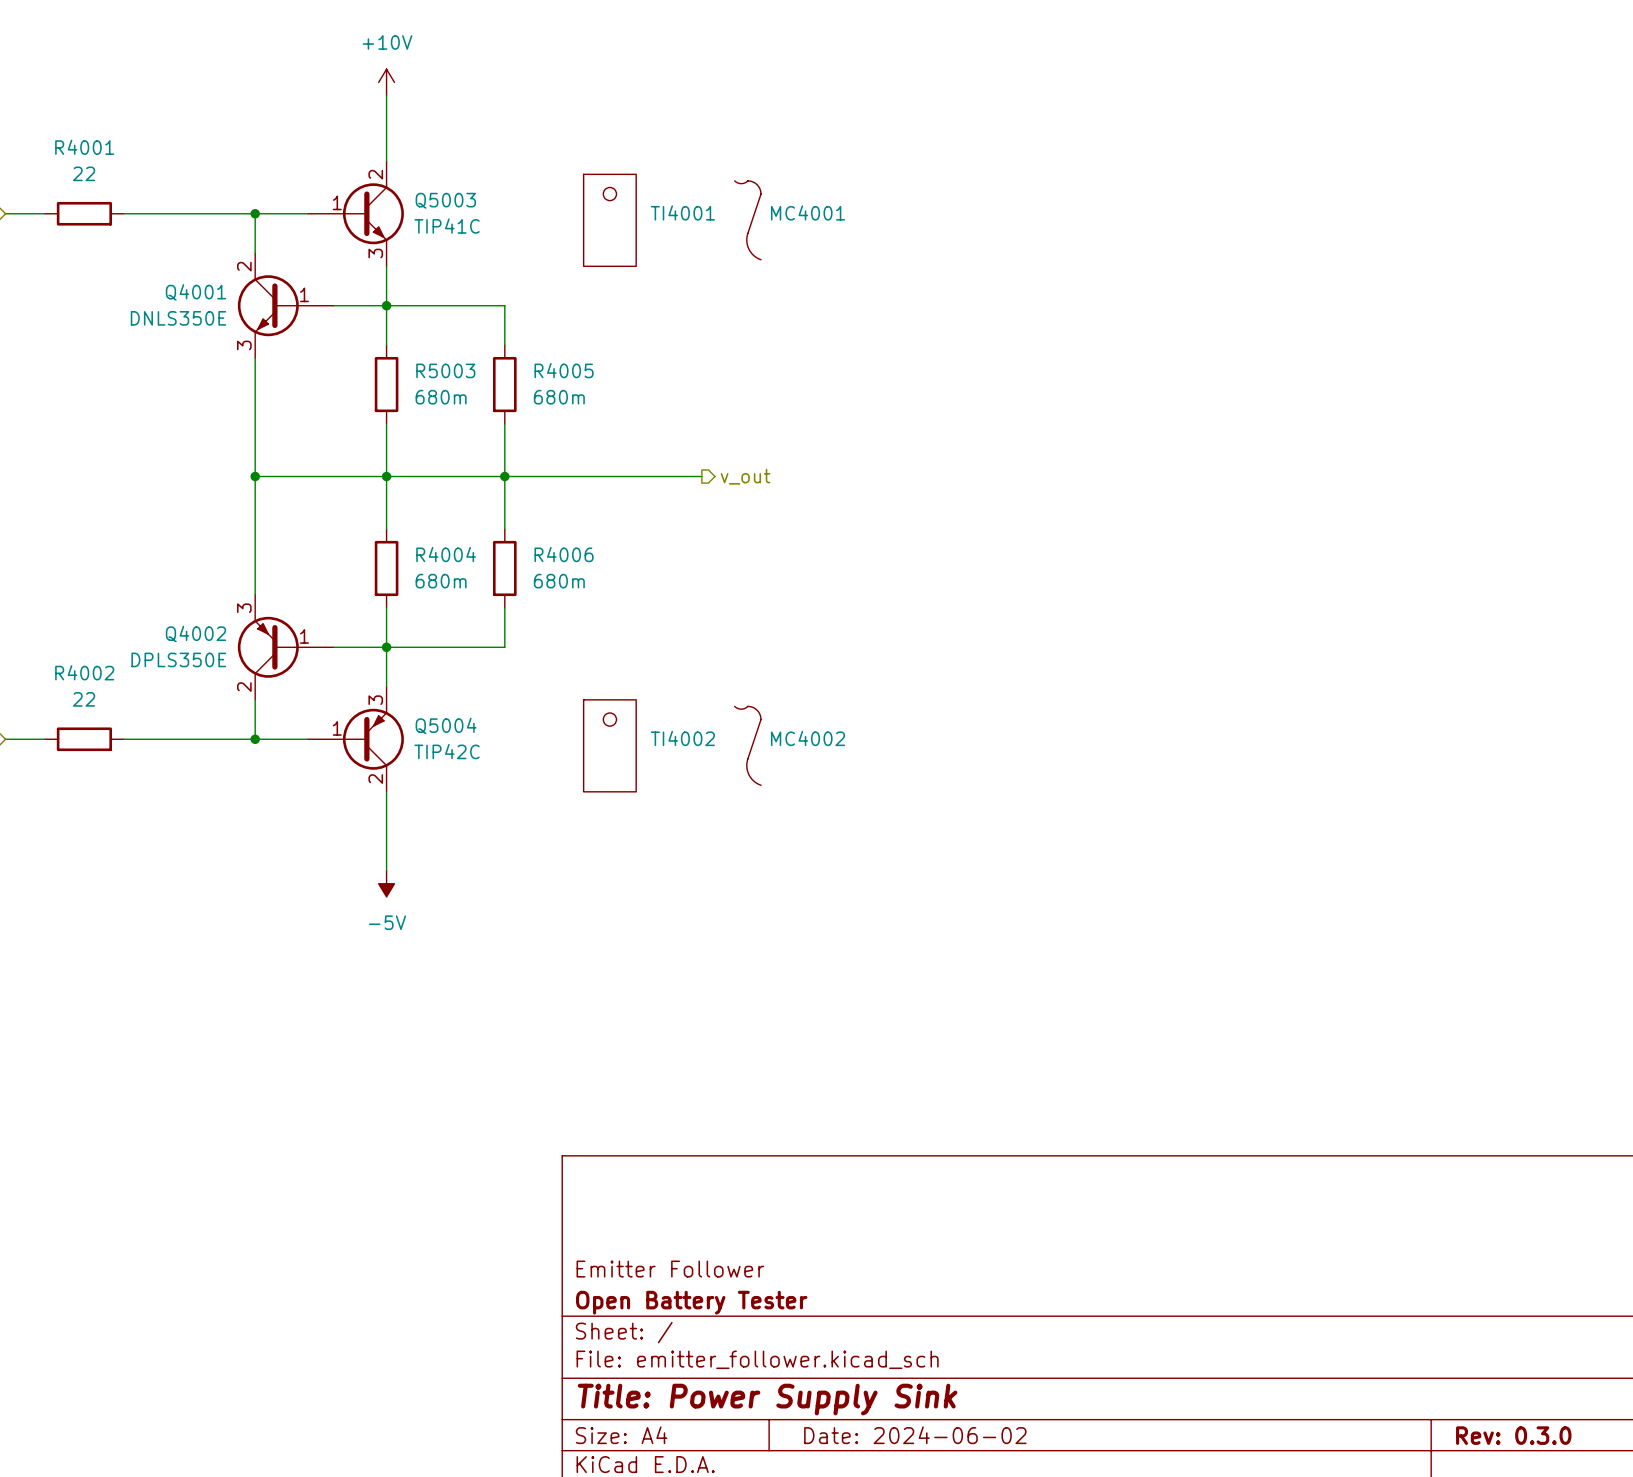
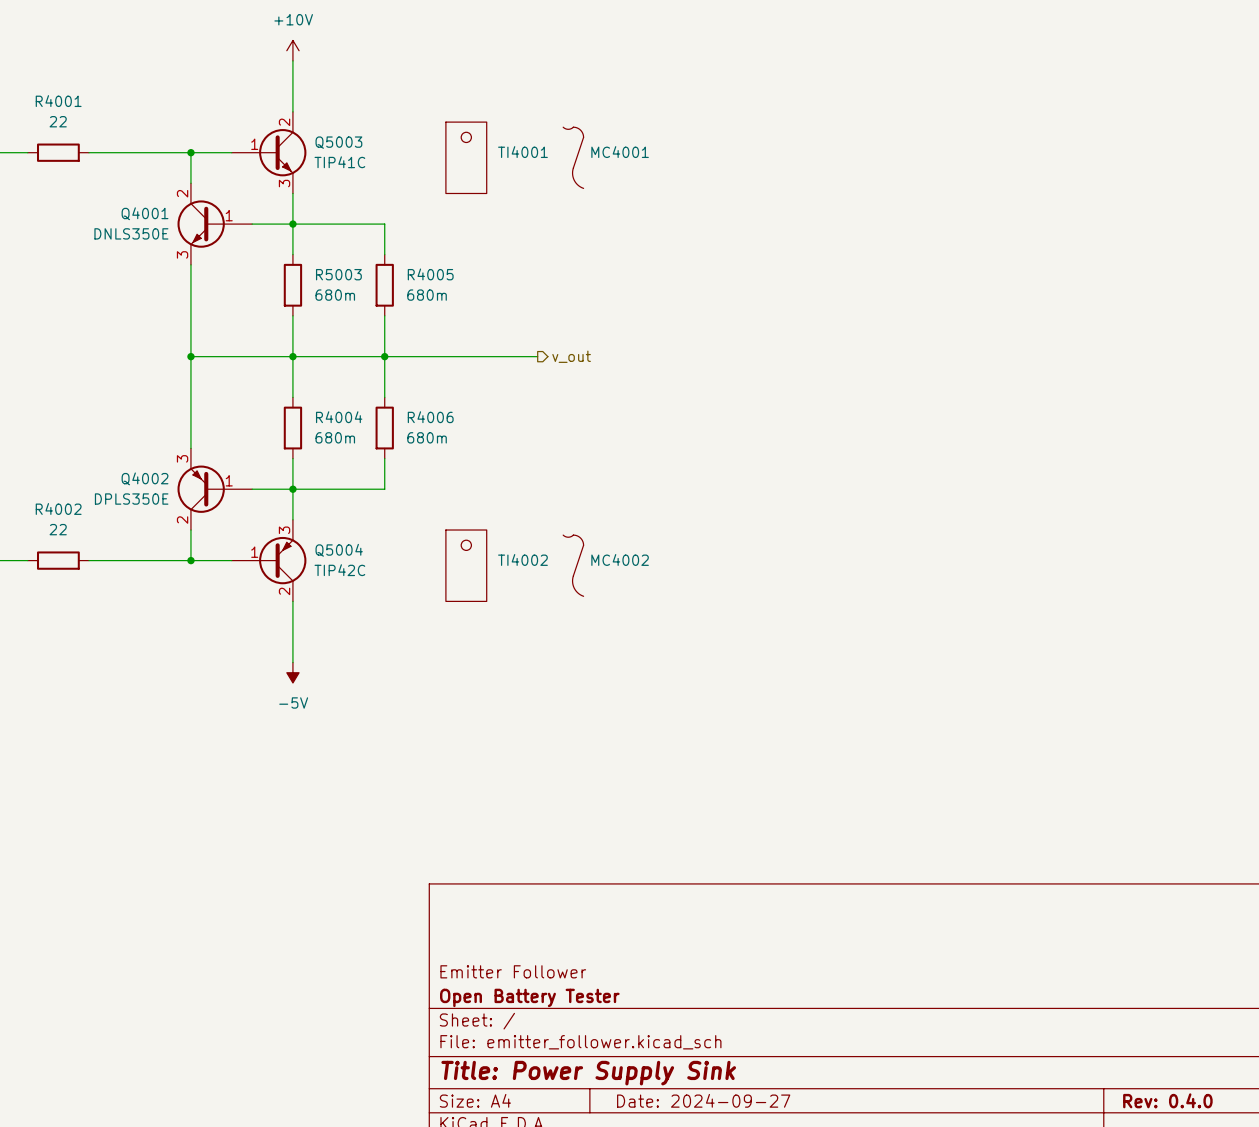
title block: Date: 2024-06-02 (915, 1435) -> Date: 2024-09-27 (703, 1100)
title block: Rev: 0.3.0 (1513, 1435) -> Rev: 0.4.0 (1167, 1100)

